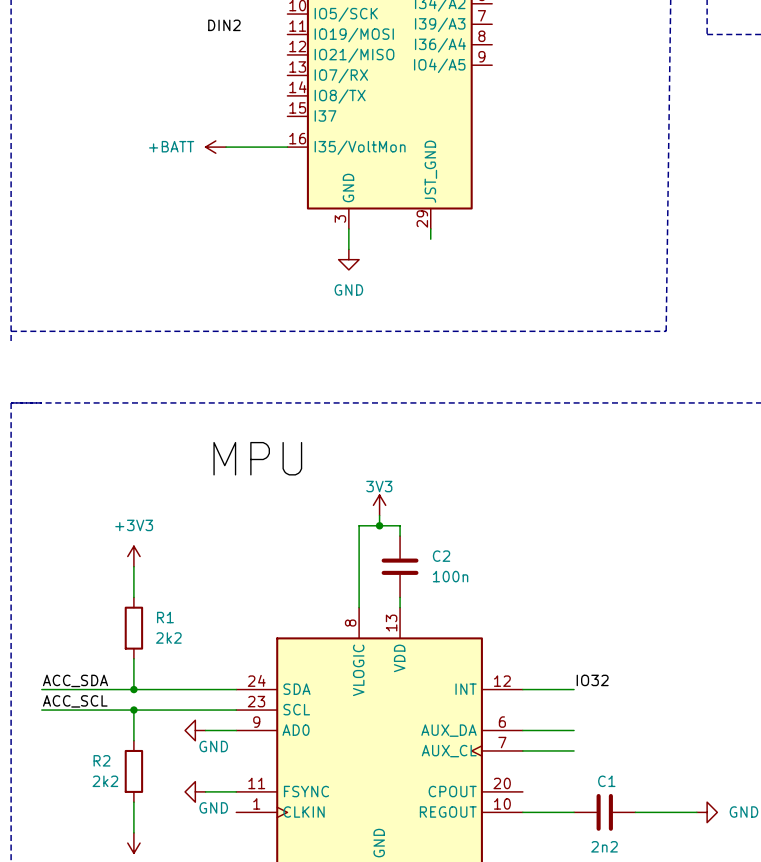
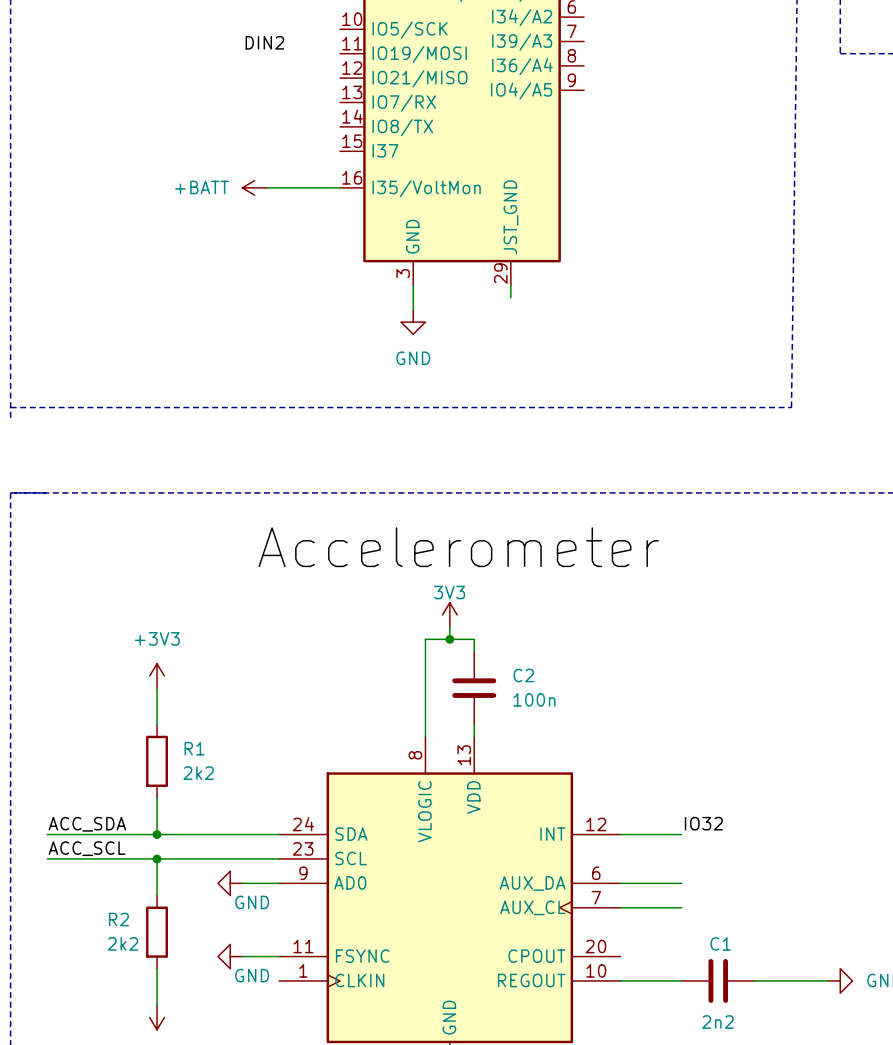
label: none -> Accelerometer (458, 547)
label: MPU (257, 458) -> none

